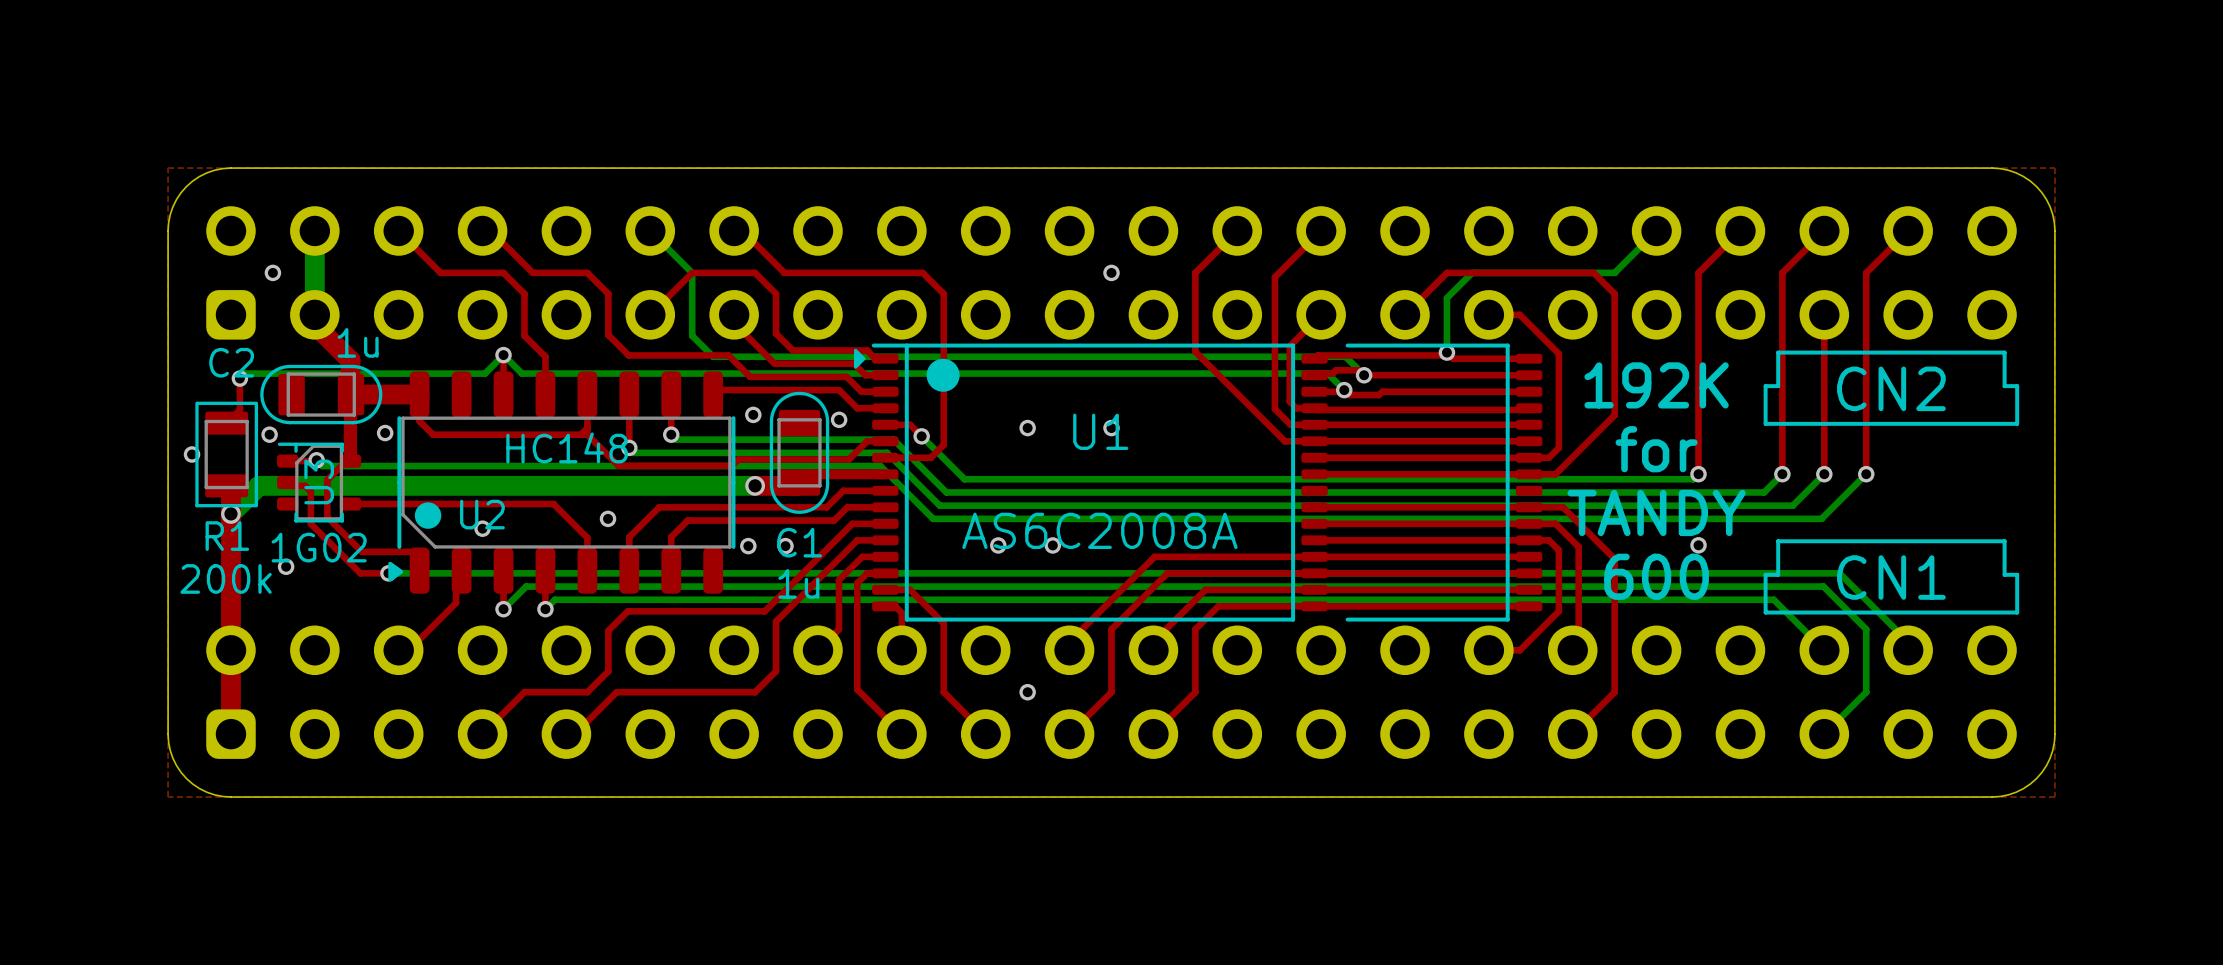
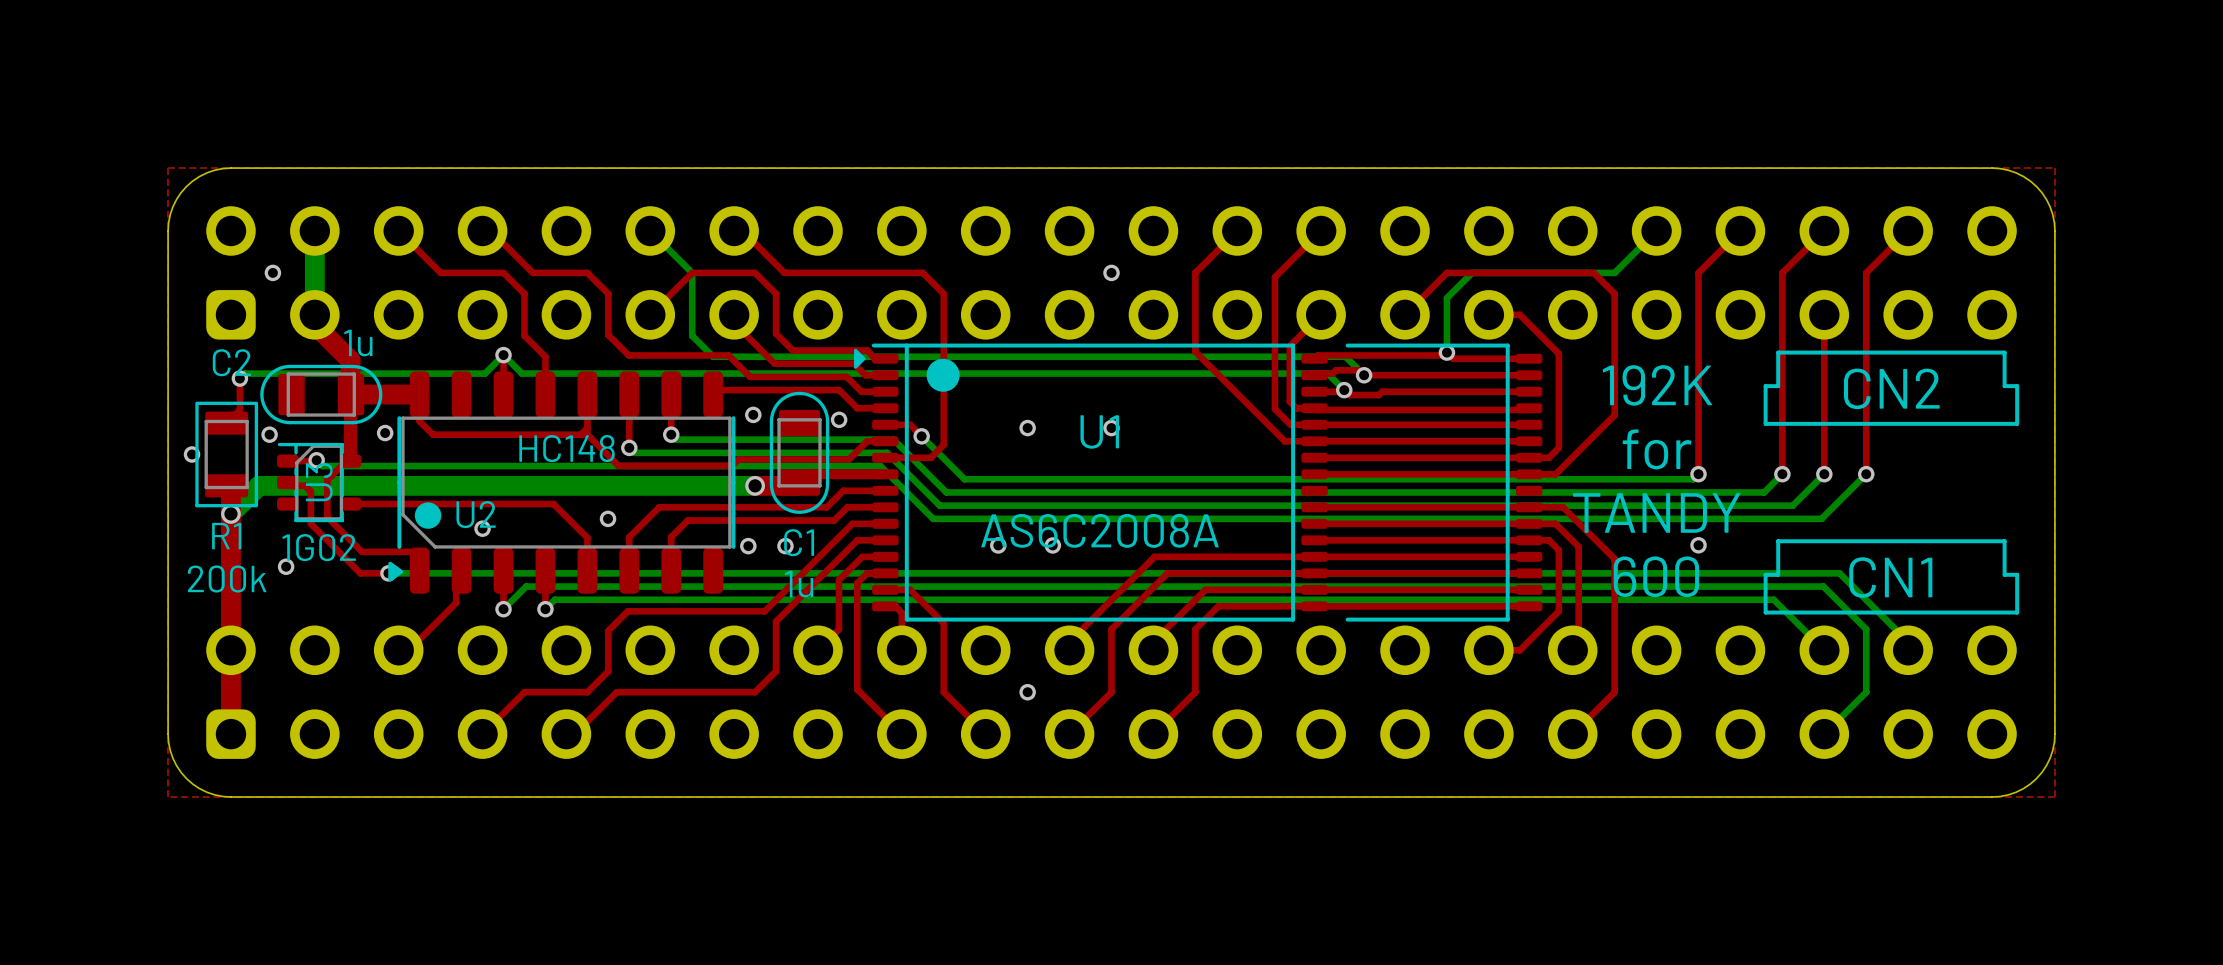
U3 footprint: [277, 442, 362, 523] -> [277, 442, 362, 523]

